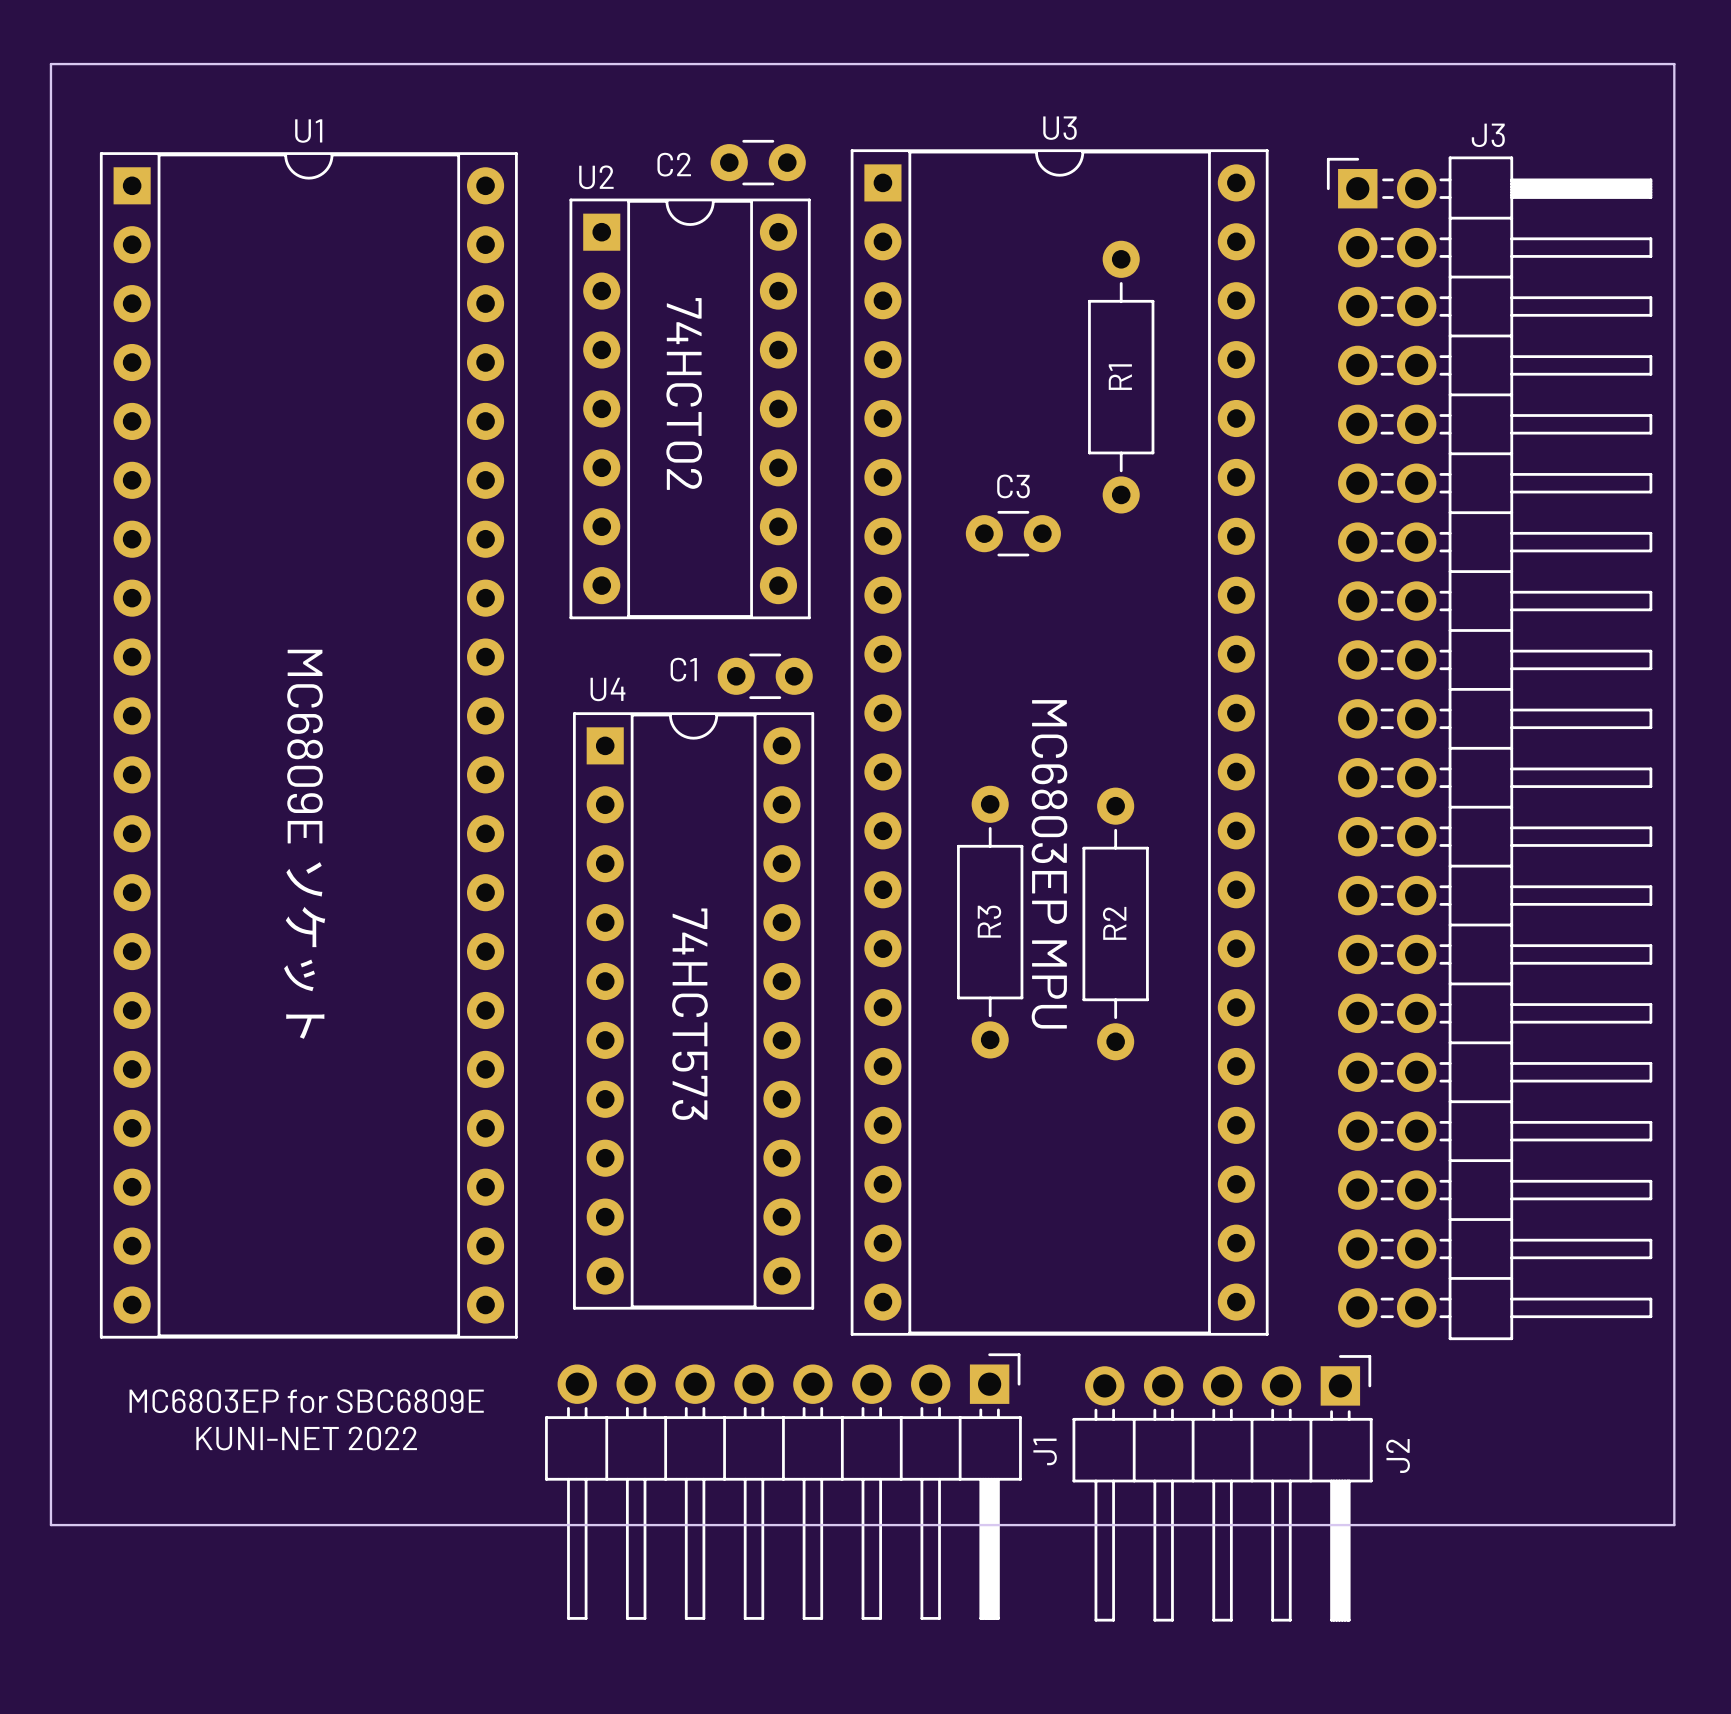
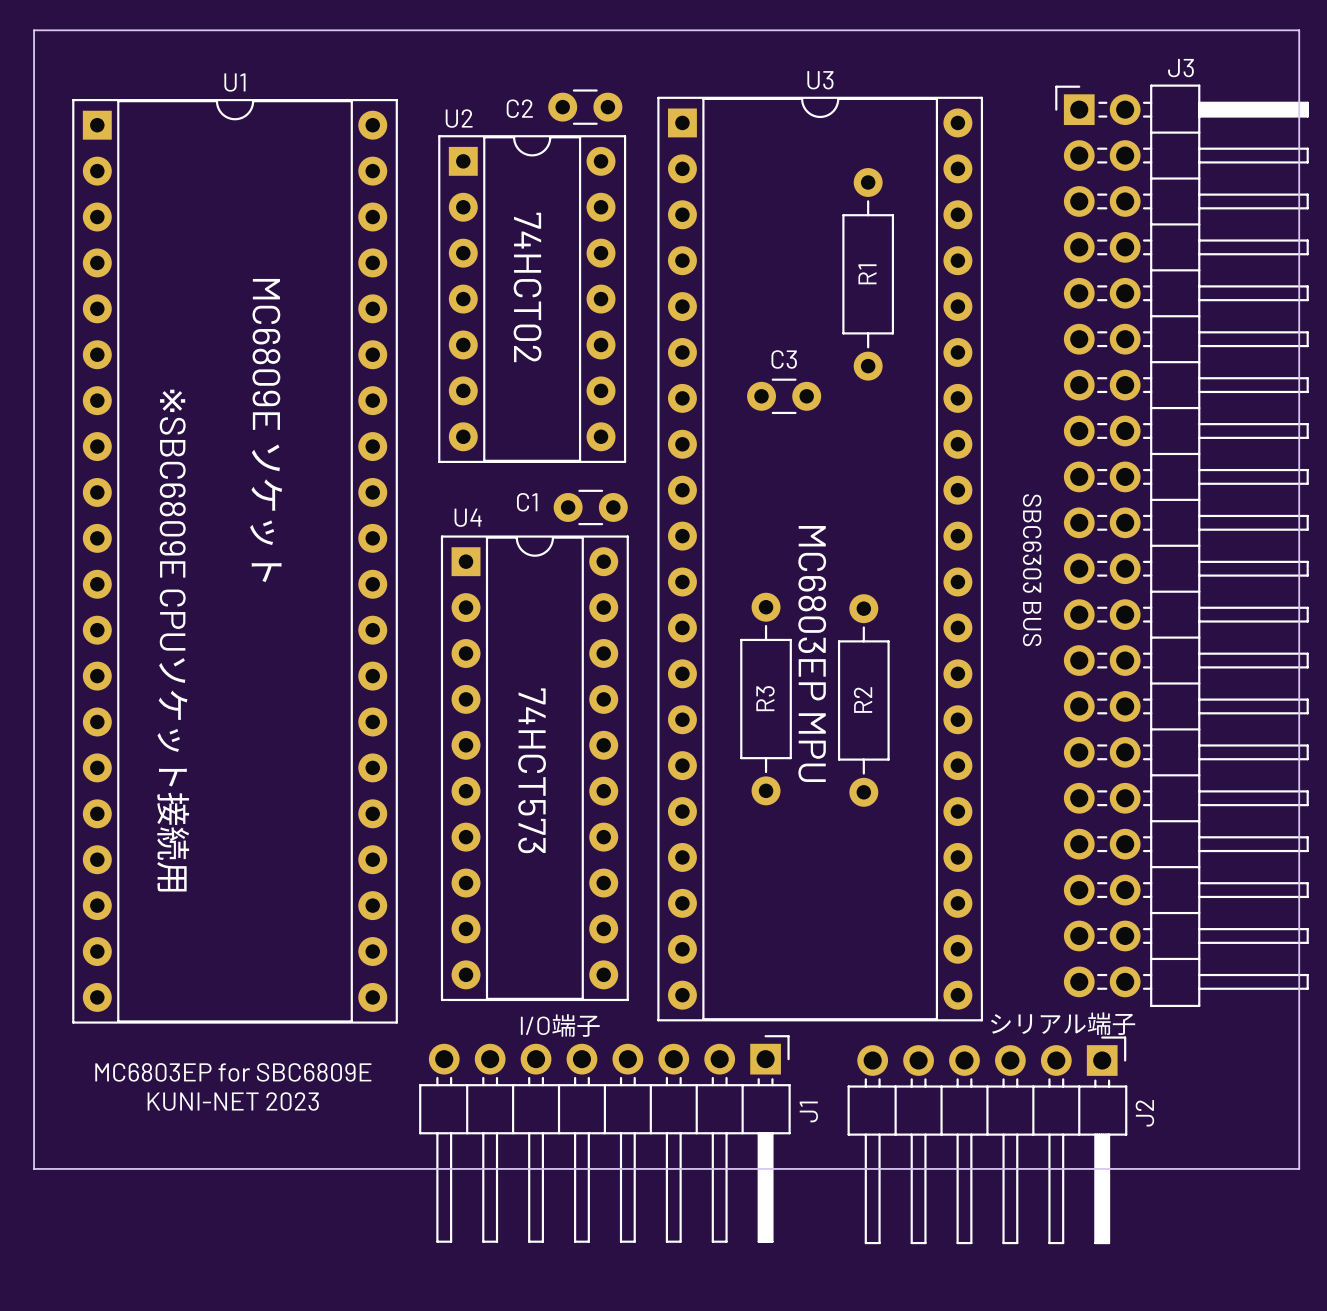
J3 position: (1489, 748) -> (1182, 545)
text: none -> SBC6303 BUS (1032, 570)
text position: MC6809E ソケット (304, 844) -> MC6809E ソケット (266, 430)
text: none -> ※SBC6809E CPUソケット接続用 (173, 640)
text: none -> シリアル端子 (1063, 1023)
text: none -> I/O端子 (560, 1025)
J2 footprint: [1072, 1355, 1373, 1622] -> [847, 1036, 1128, 1245]
text: KUNI-NET 2022 (306, 1438) -> KUNI-NET 2023 (233, 1101)

